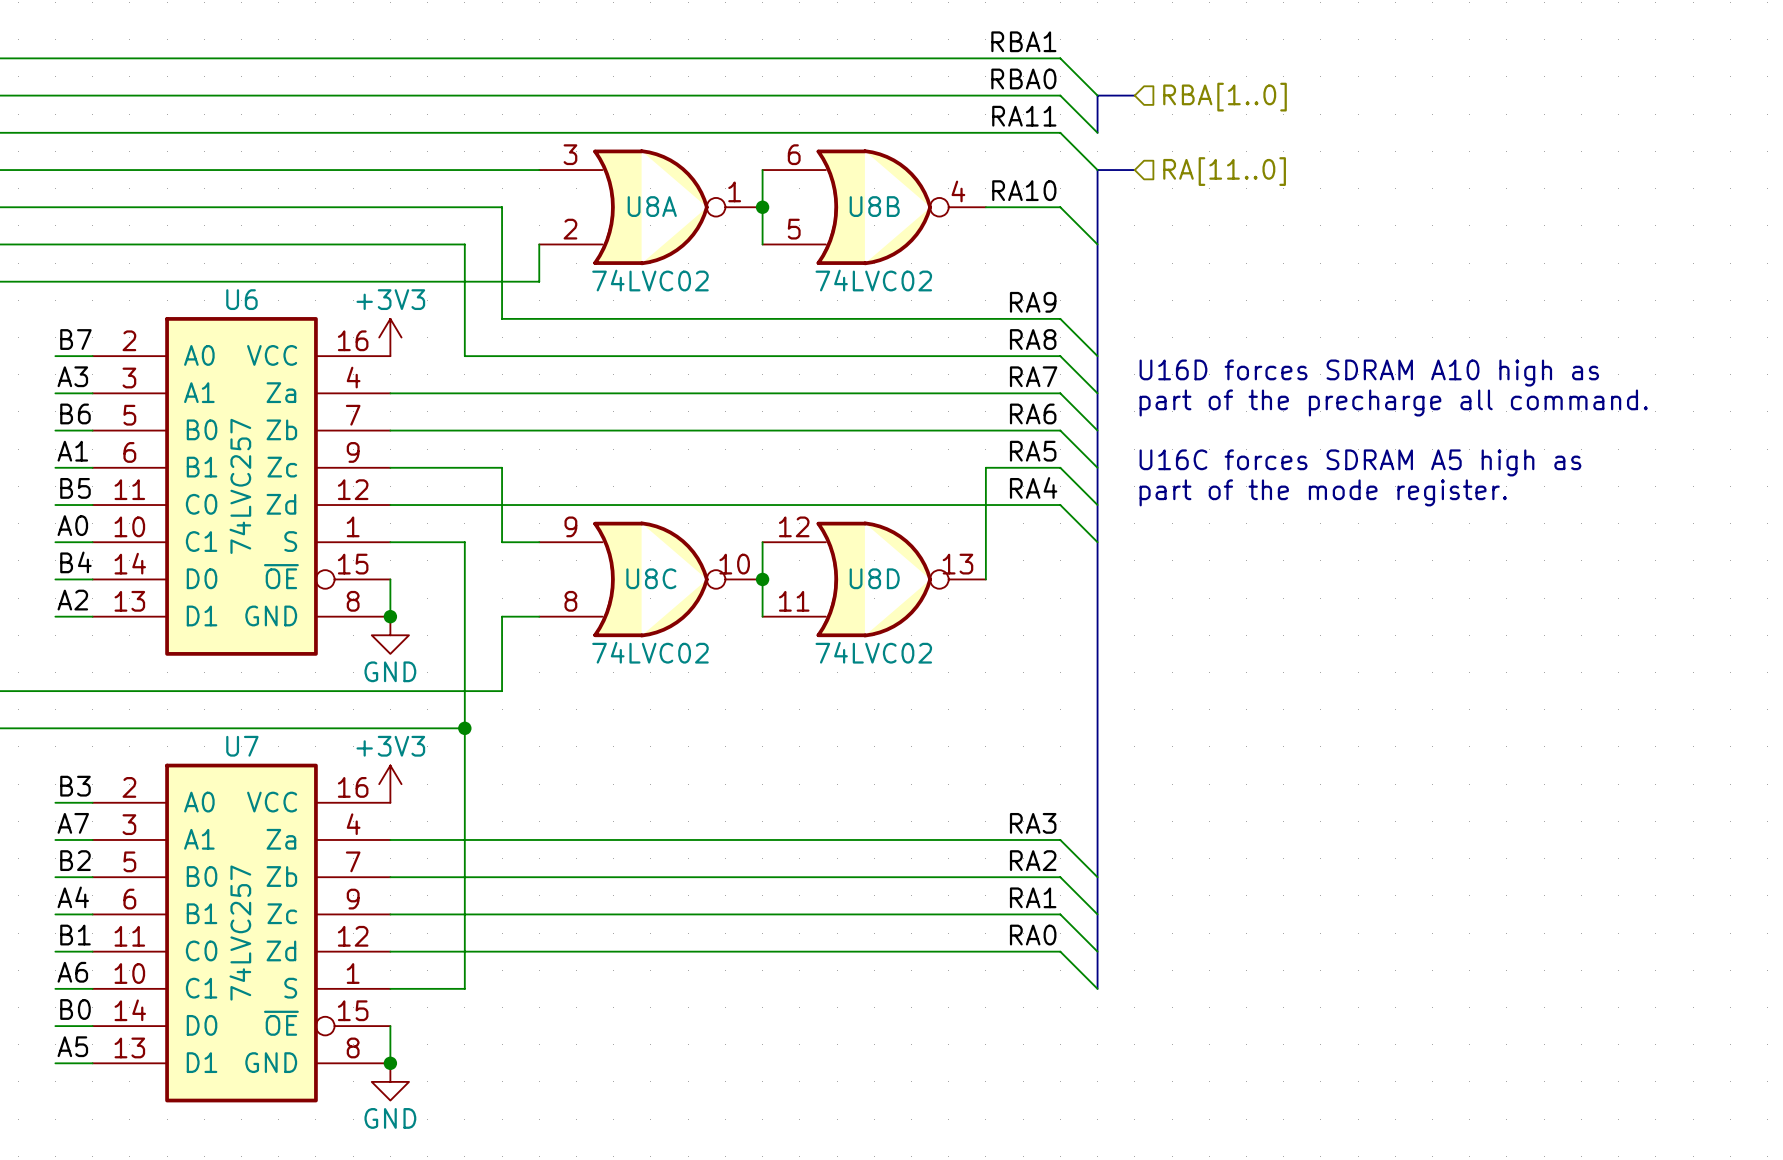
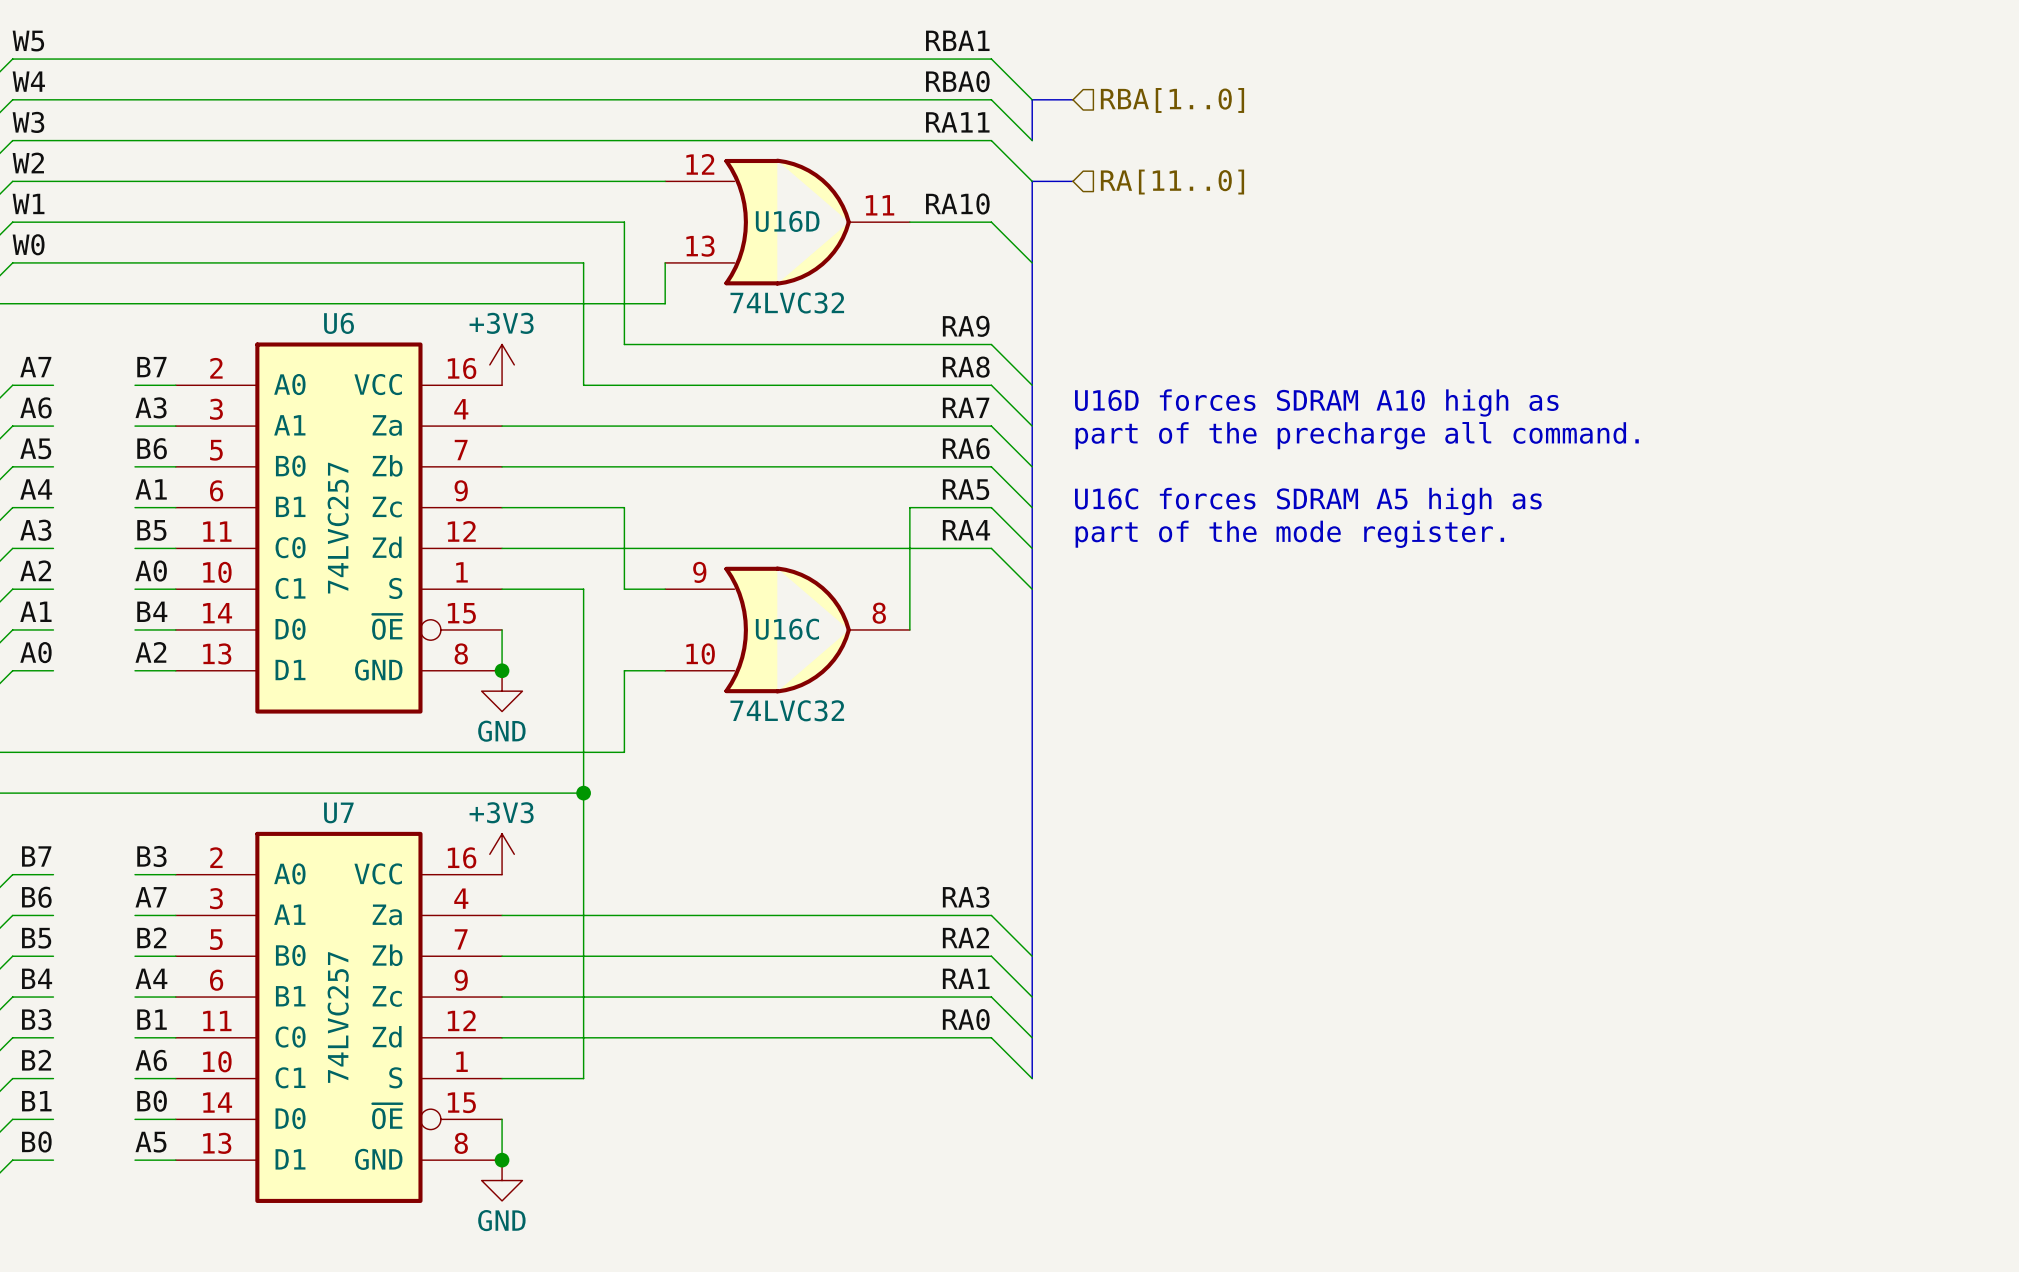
label position: RBA1 (1023, 41) -> RBA1 (957, 40)
wire: (837, 58) (1060, 58) (1097, 95) -> (991, 59) (1032, 99)
label position: RBA0 (1023, 78) -> RBA0 (957, 81)
wire: (837, 95) (1060, 95) (1097, 132) -> (991, 99) (1032, 140)
bus: (1134, 95) (1097, 95) (1097, 132) -> (1073, 99) (1032, 99) (1032, 140)
hierarchical label position: RBA[1..0] (1225, 97) -> RBA[1..0] (1172, 100)
label position: RA11 (1024, 116) -> RA11 (957, 122)
wire: (837, 132) (1060, 132) (1097, 170) -> (991, 140) (1032, 181)
wire: (762, 170) (762, 244) -> none
bus: (1134, 170) (1097, 170) (1097, 988) -> (1073, 181) (1032, 181) (1032, 1078)
hierarchical label position: RA[11..0] (1224, 171) -> RA[11..0] (1172, 182)
label position: RA10 (1024, 190) -> RA10 (957, 203)
U8A: 74LVC02 (650, 207) -> none
U16D: none -> 74LVC32 (787, 222)
junction: (762, 207) -> none
U8B: 74LVC02 (874, 207) -> none
wire: (985, 207) (1060, 207) (1097, 244) -> (909, 222) (991, 222) (1032, 262)
label position: RA9 (1033, 302) -> RA9 (966, 326)
wire: (837, 318) (1060, 318) (1097, 356) -> (991, 344) (1032, 385)
label position: RA8 (1033, 339) -> RA8 (966, 367)
wire: (837, 356) (1060, 356) (1097, 393) -> (991, 385) (1032, 426)
text position: U16D forces SDRAM A10 high as (1369, 373) -> U16D forces SDRAM A10 high as (1316, 402)
label position: RA7 (1033, 376) -> RA7 (966, 407)
wire: (837, 393) (1060, 393) (1097, 430) -> (991, 426) (1032, 466)
text position: part of the precharge all command. (1393, 402) -> part of the precharge all command. (1357, 435)
label position: RA6 (1033, 413) -> RA6 (966, 448)
wire: (837, 430) (1060, 430) (1097, 467) -> (991, 466) (1032, 507)
label position: RA5 (1033, 451) -> RA5 (966, 489)
text position: U16C forces SDRAM A5 high as (1360, 462) -> U16C forces SDRAM A5 high as (1308, 501)
label position: RA4 (1033, 487) -> RA4 (966, 530)
text position: part of the mode register. (1323, 492) -> part of the mode register. (1289, 534)
wire: (837, 505) (1060, 505) (1097, 542) -> (991, 548) (1032, 589)
wire: none -> (1032, 548) (991, 507) (909, 507) (909, 589)
wire: (1097, 505) (1060, 467) (985, 467) (985, 579) -> none
U8C: 74LVC02 (650, 579) -> none
U16C: none -> 74LVC32 (787, 629)
wire: (762, 579) (762, 616) -> none
junction: (762, 579) -> none
U8D: 74LVC02 (874, 579) -> none
label position: RA3 (1033, 823) -> RA3 (966, 897)
wire: (837, 839) (1060, 839) (1097, 877) -> (991, 915) (1032, 956)
label position: RA2 (1033, 860) -> RA2 (965, 937)
wire: (837, 877) (1060, 877) (1097, 914) -> (991, 956) (1032, 997)
label position: RA1 (1033, 897) -> RA1 (966, 978)
wire: (837, 914) (1060, 914) (1097, 951) -> (991, 997) (1032, 1037)
label position: RA0 (1033, 935) -> RA0 (966, 1019)
wire: (837, 951) (1060, 951) (1097, 988) -> (991, 1037) (1032, 1078)

